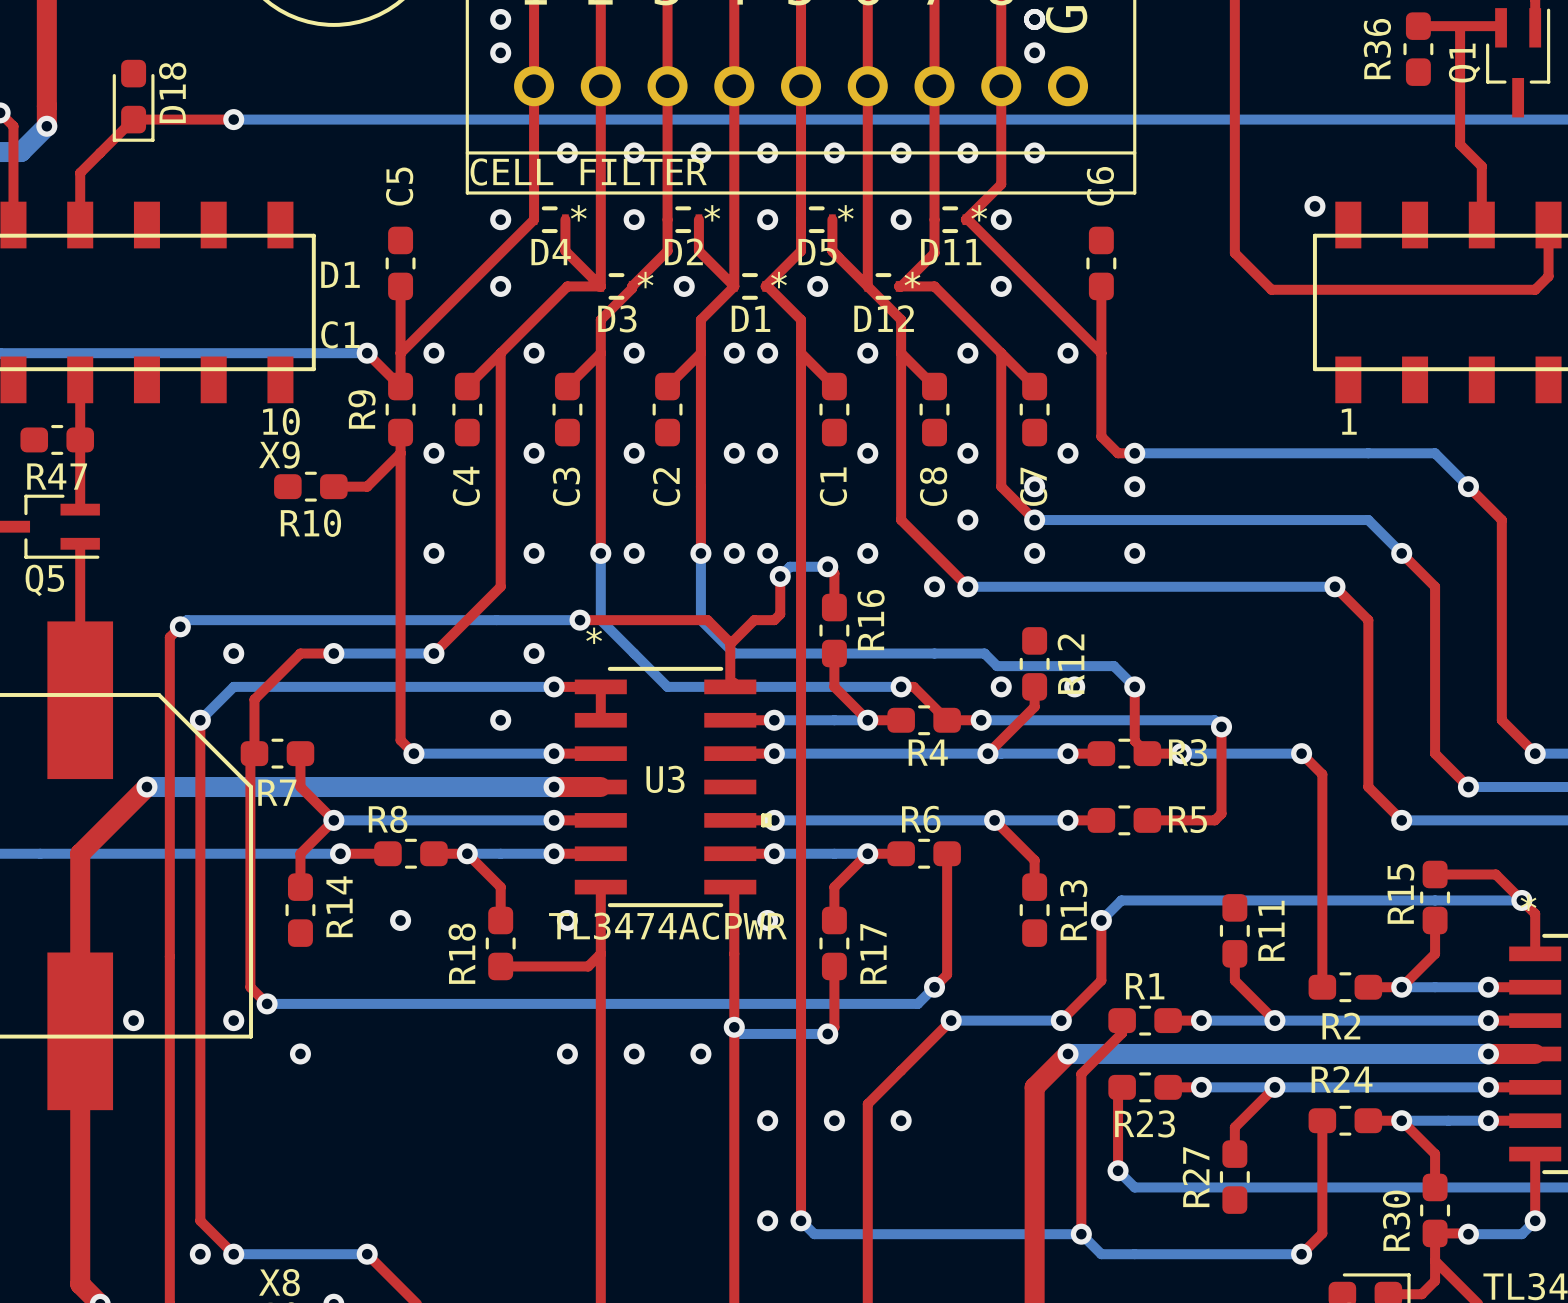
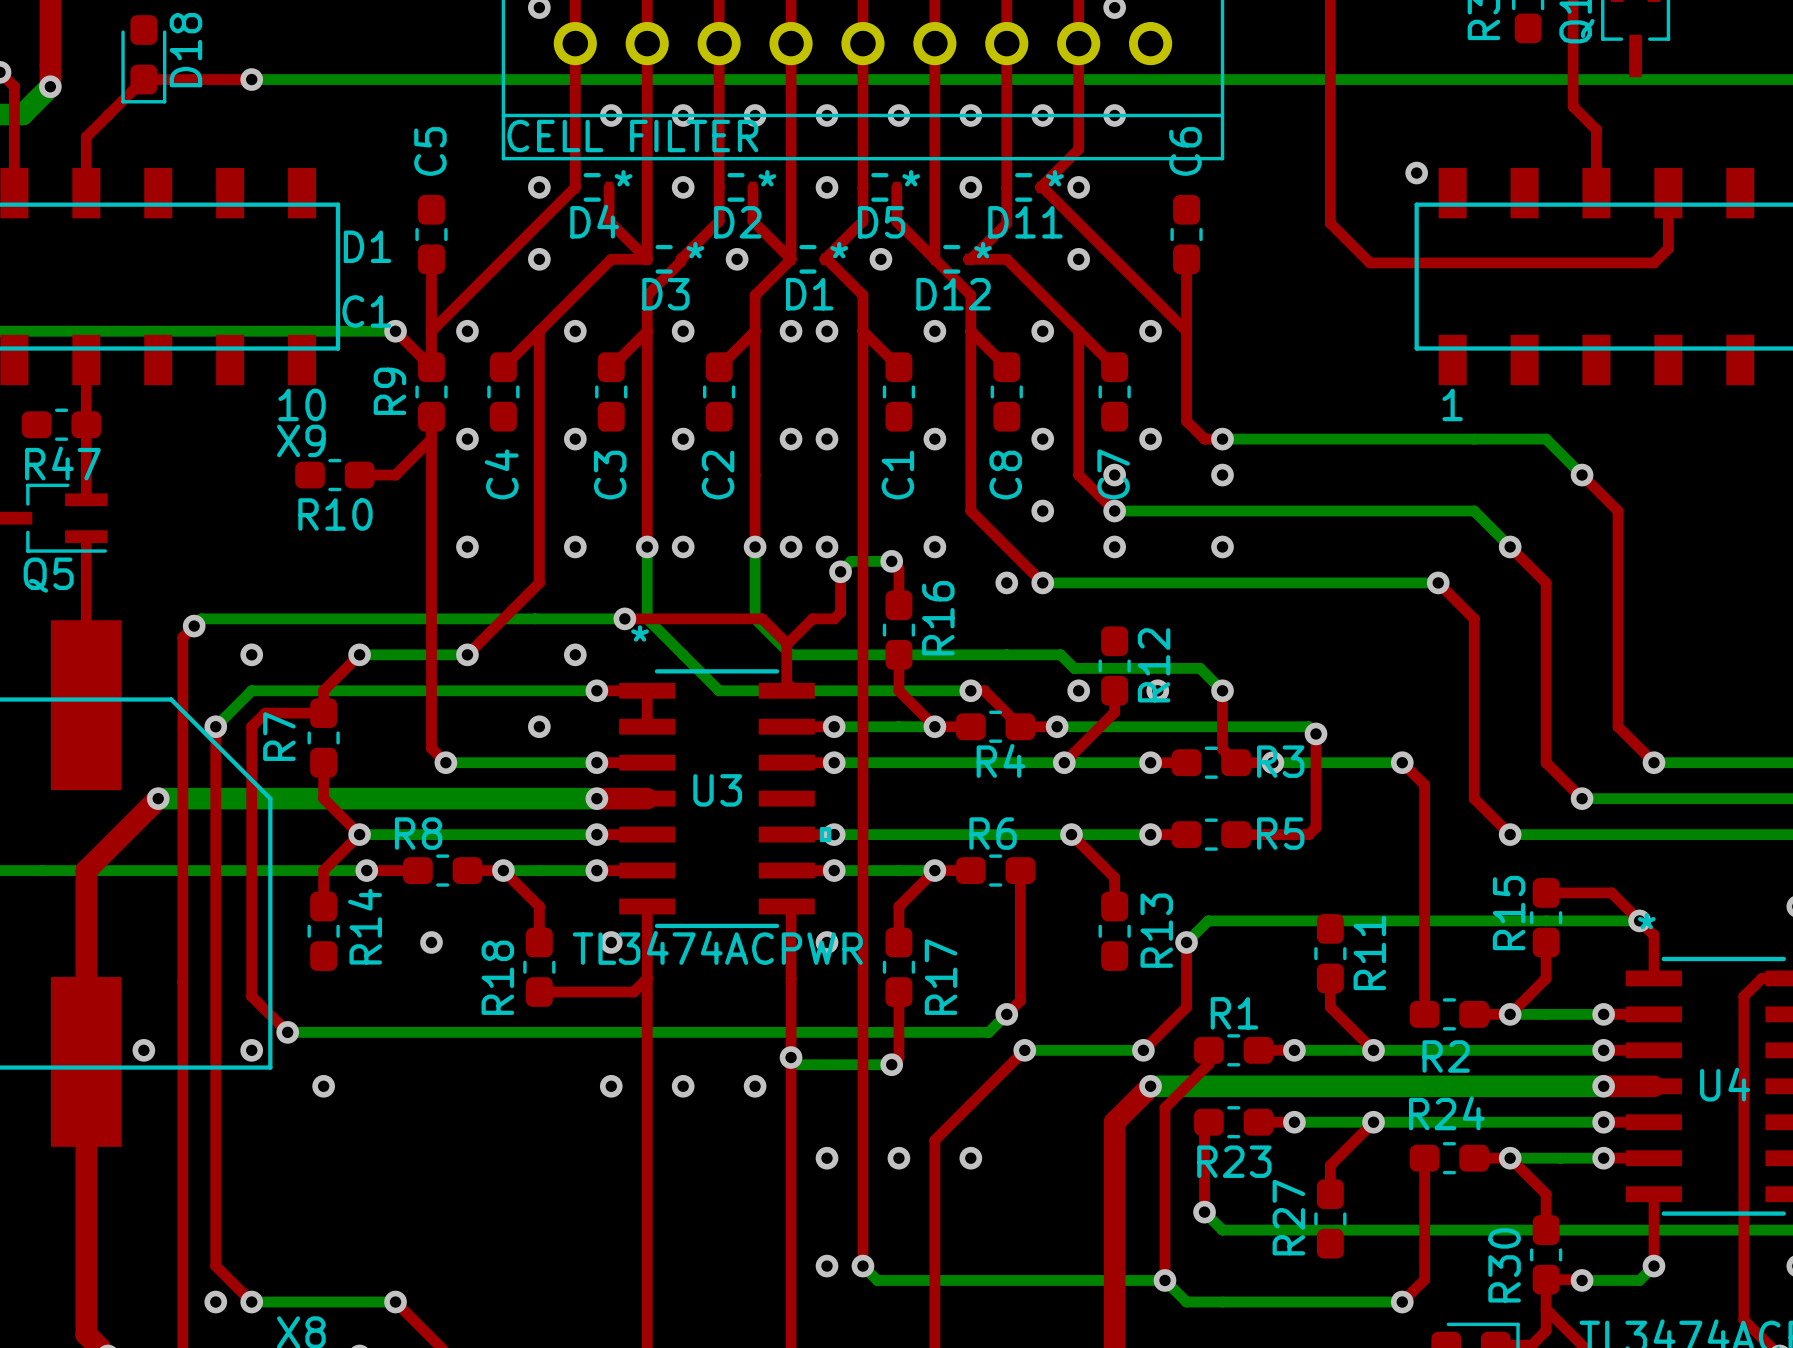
top track: (333, 653) (300, 653) (254, 699) (254, 753) (250, 757) (250, 987) -> (359, 654) (323, 690) (323, 713) (265, 713) (251, 726) (251, 996) (269, 1014)
R7 rotation: 0° (277, 753) -> 90° clockwise (323, 737)

